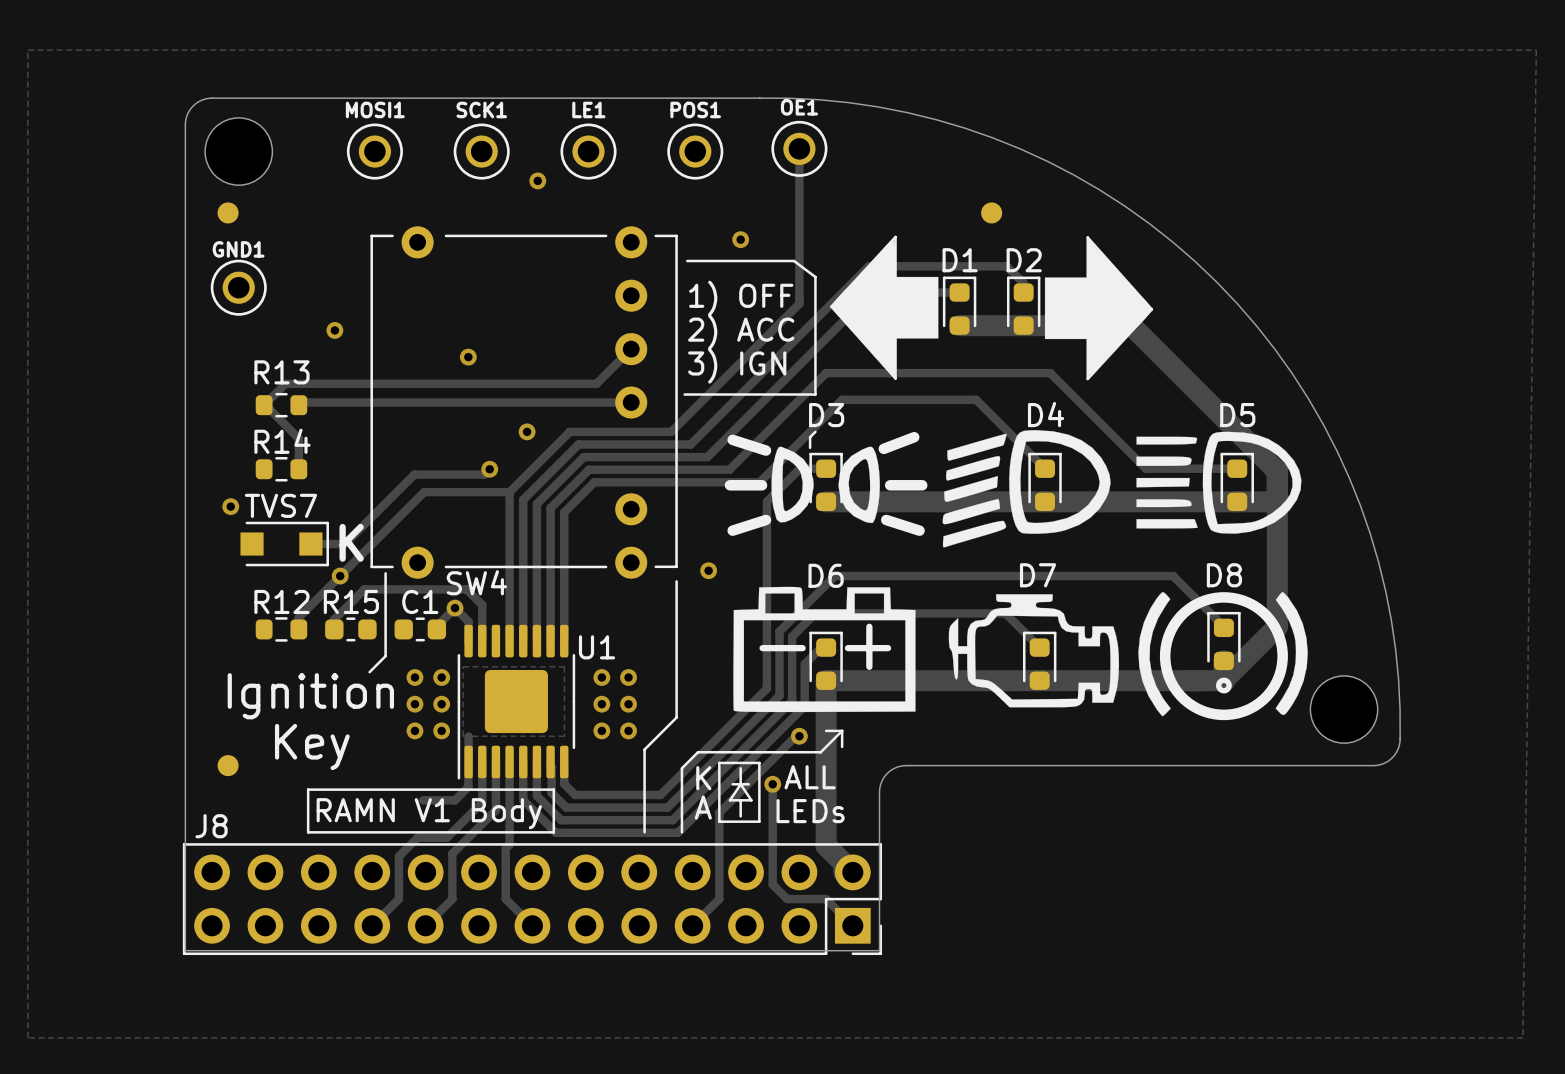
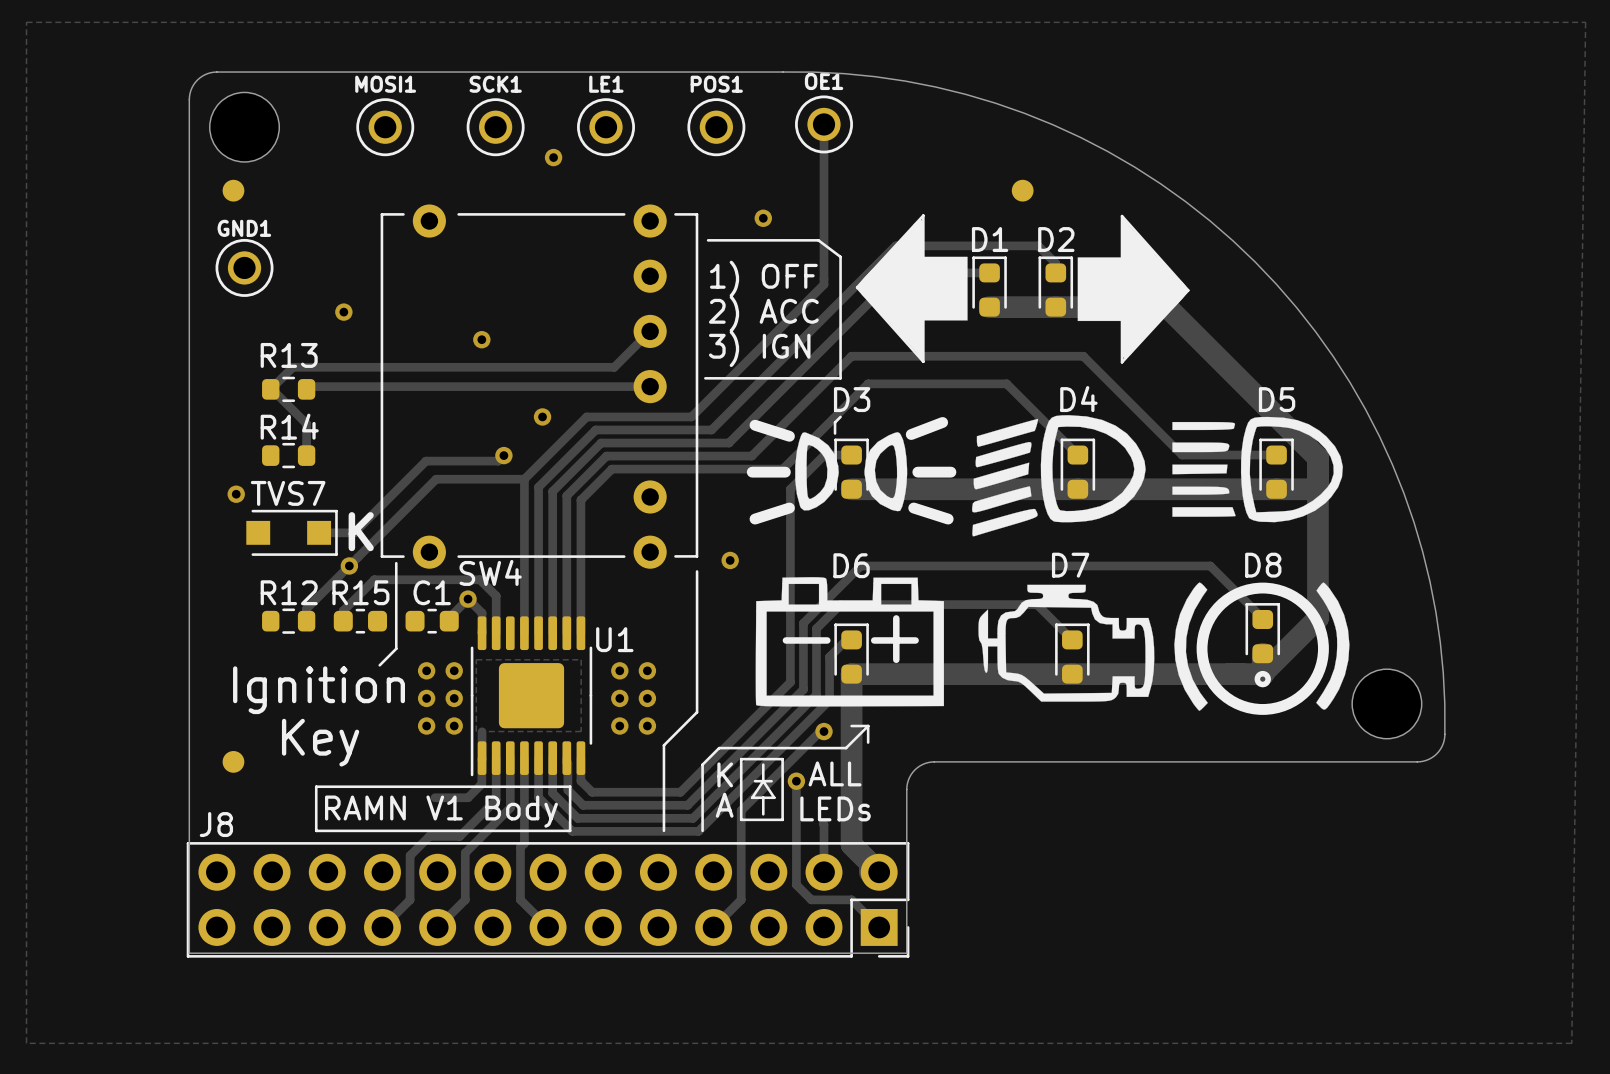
track: none -> (823, 823) (824, 872)

